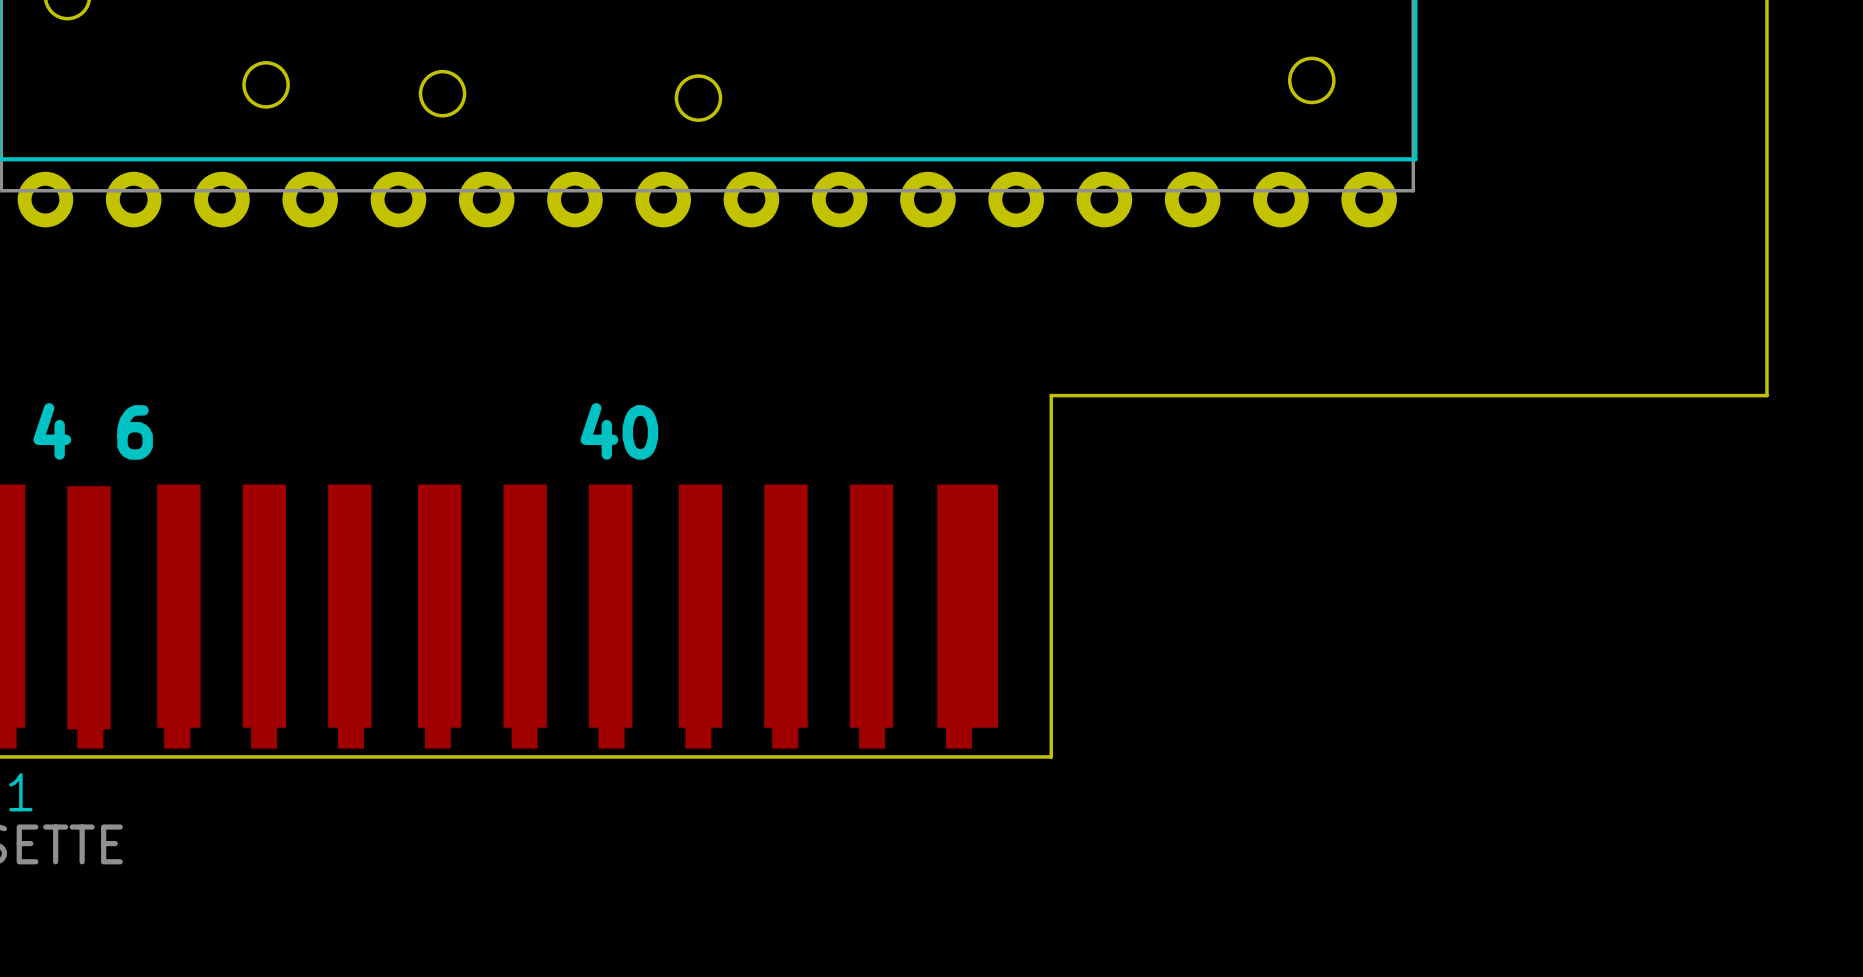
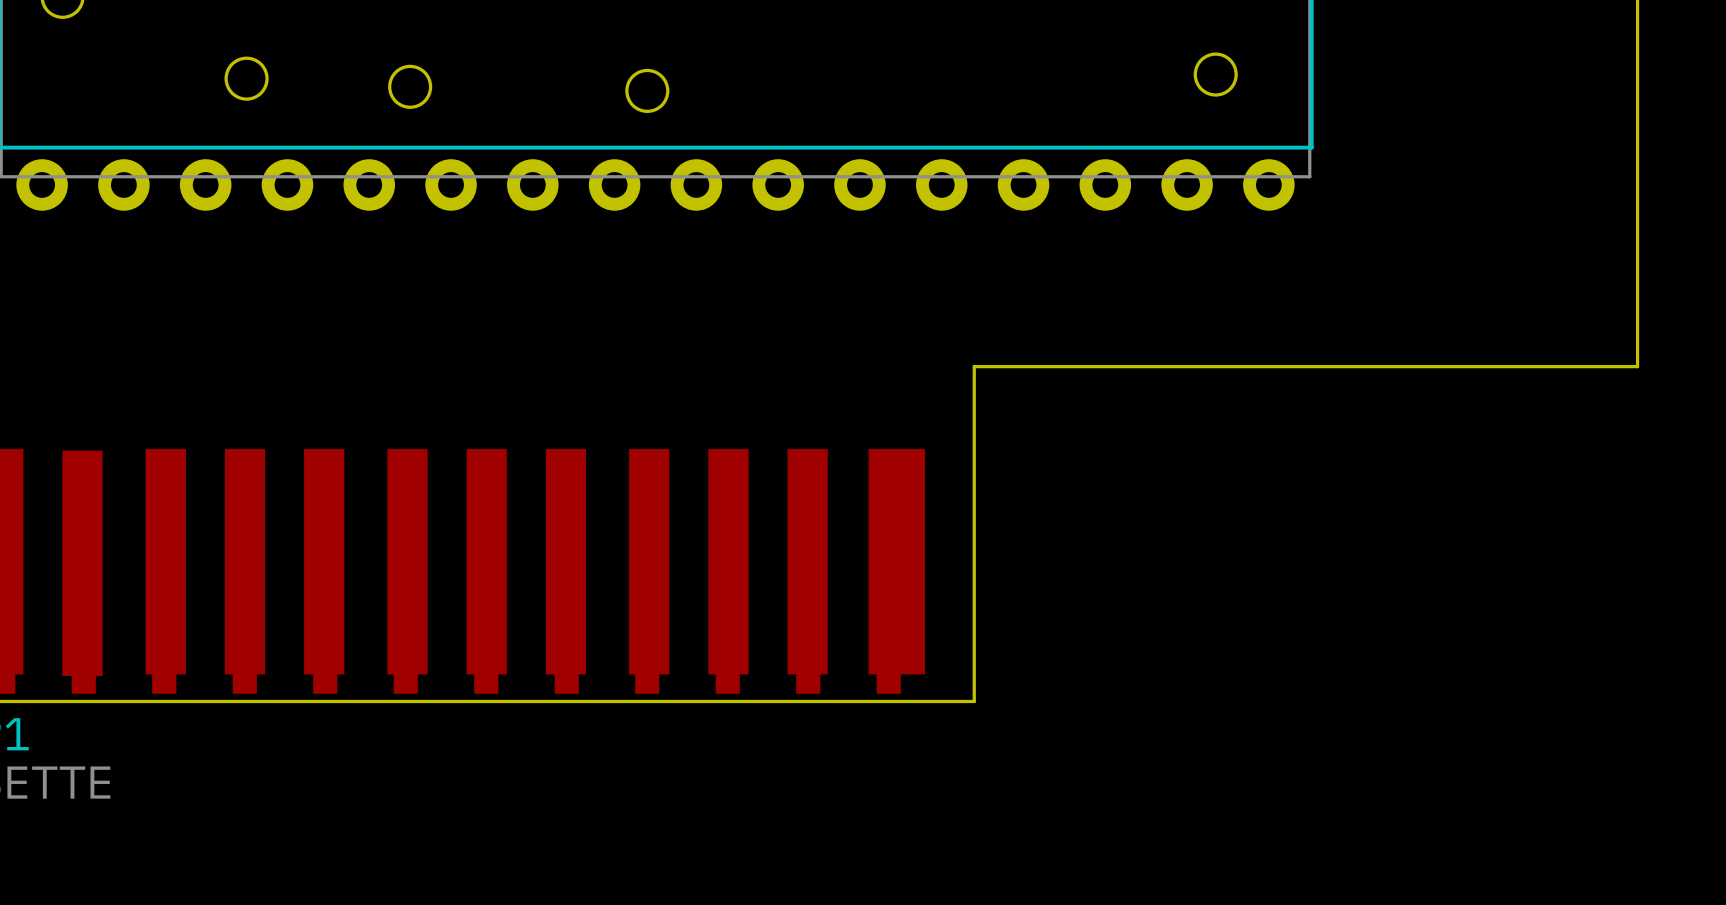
text: 4 (52, 431) -> none
text: 40 (619, 431) -> none
text: 6 (135, 432) -> none

